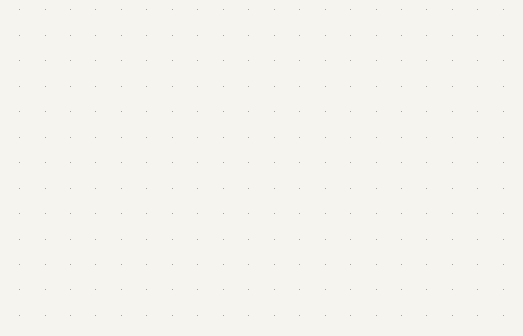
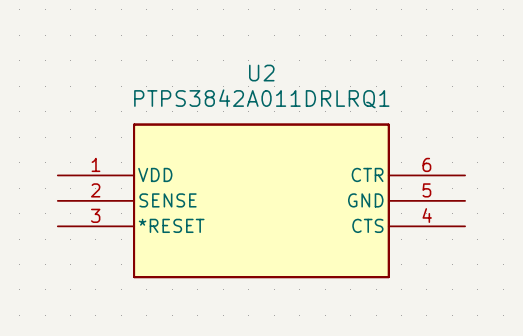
U2: none -> PTPS3842A011DRLRQ1 (261, 200)

